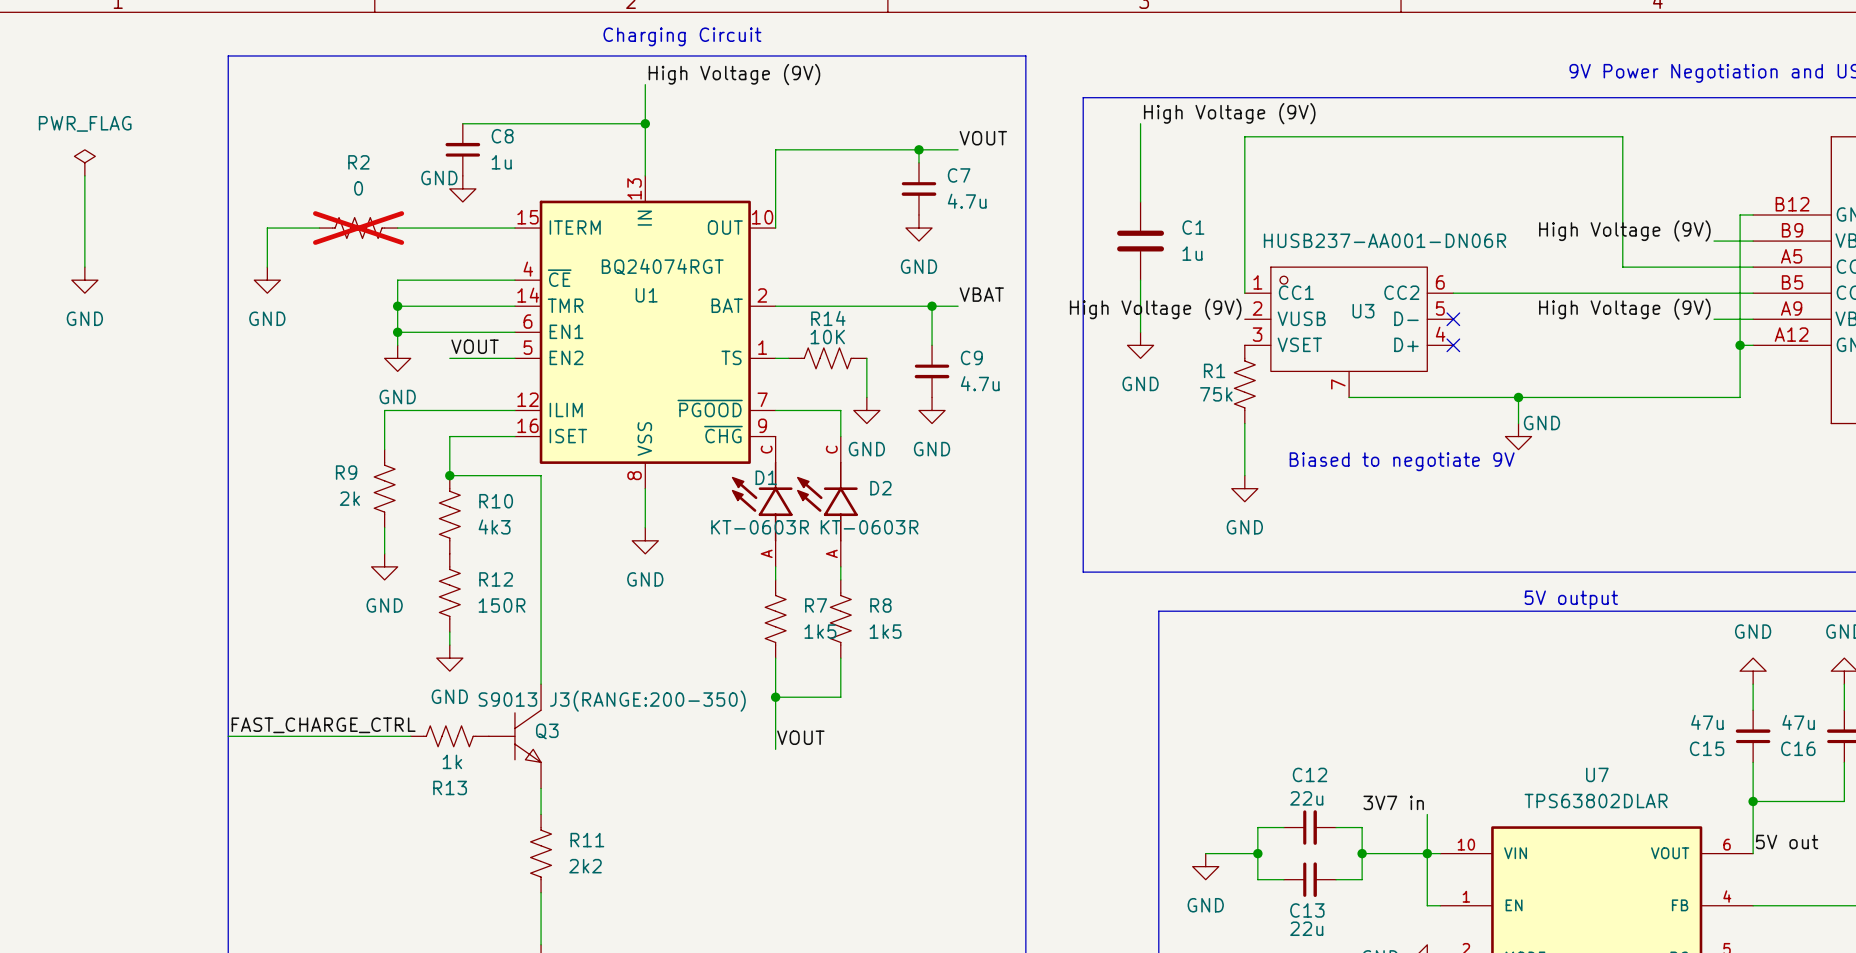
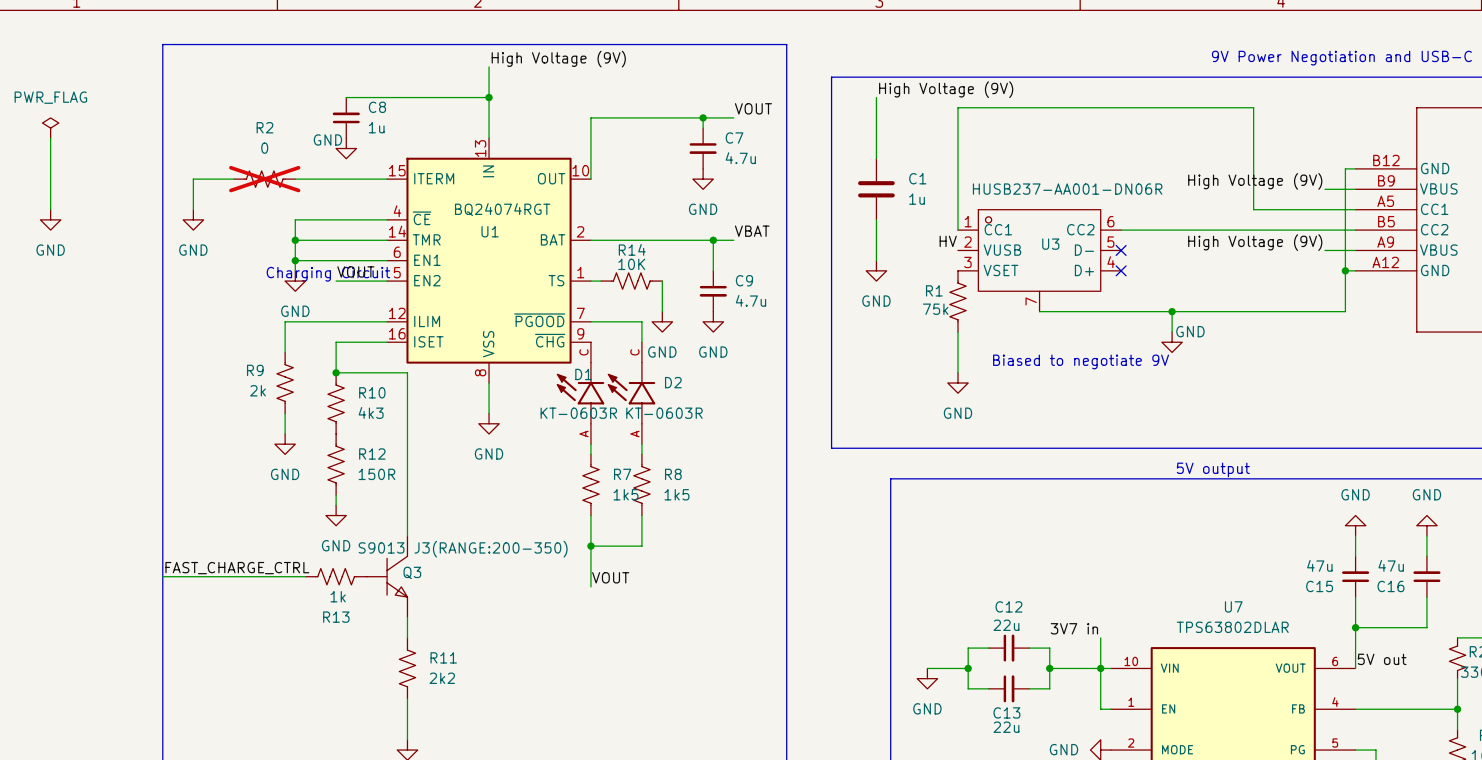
text: Charging Circuit (682, 36) -> none
label: High Voltage (9V) (1155, 309) -> HV (948, 241)
text: none -> Charging Circuit (328, 274)

